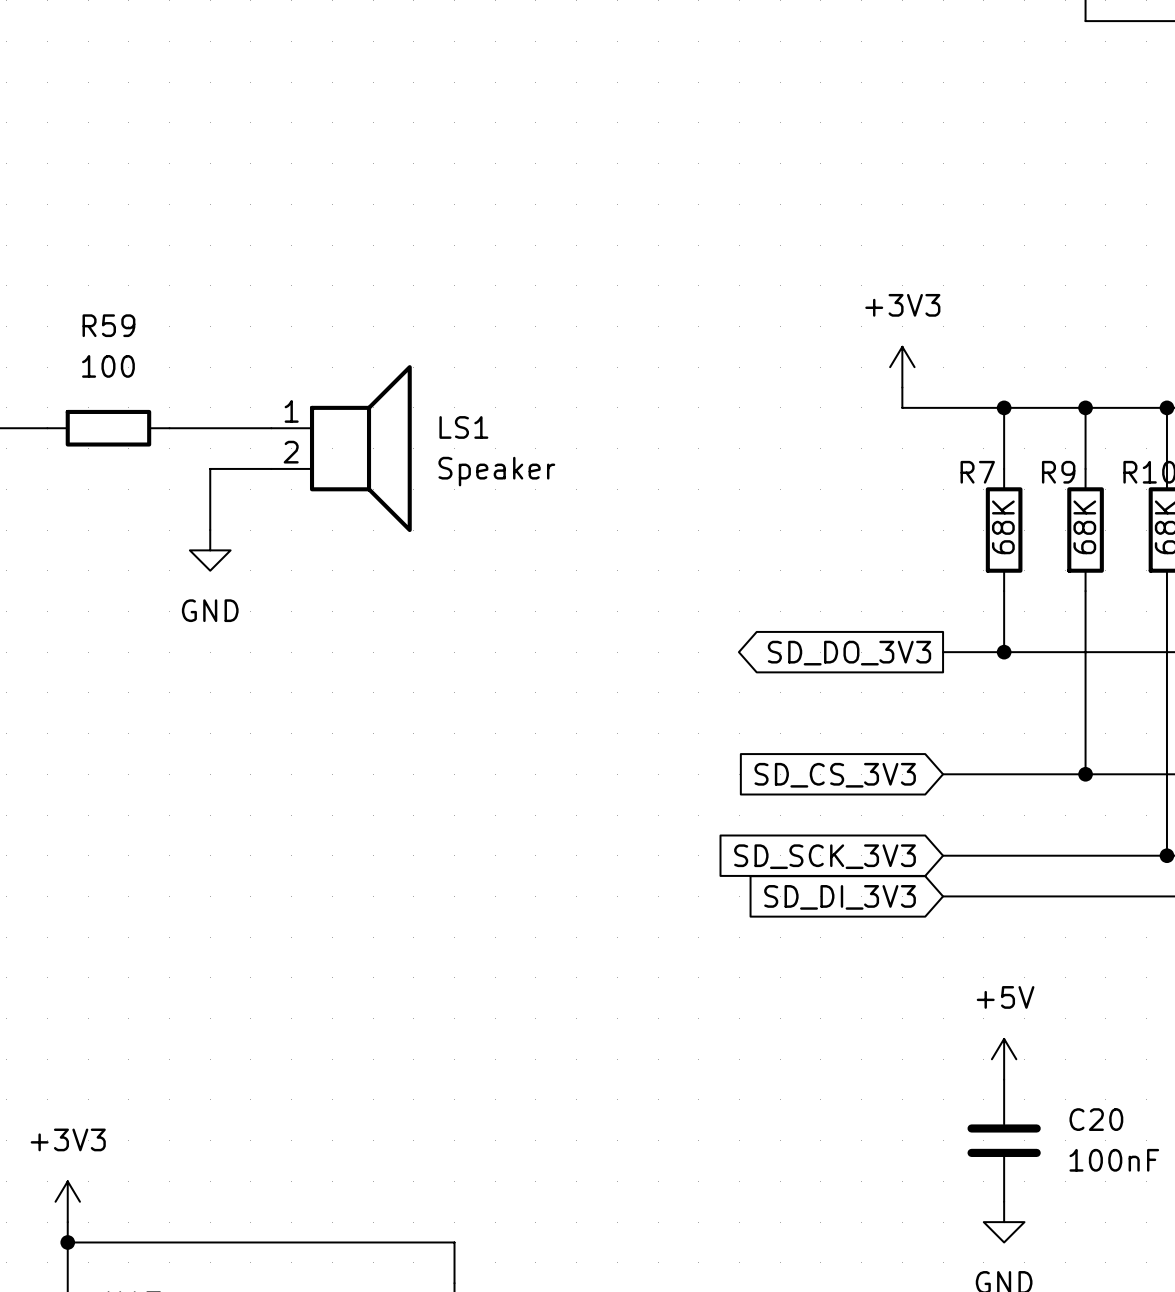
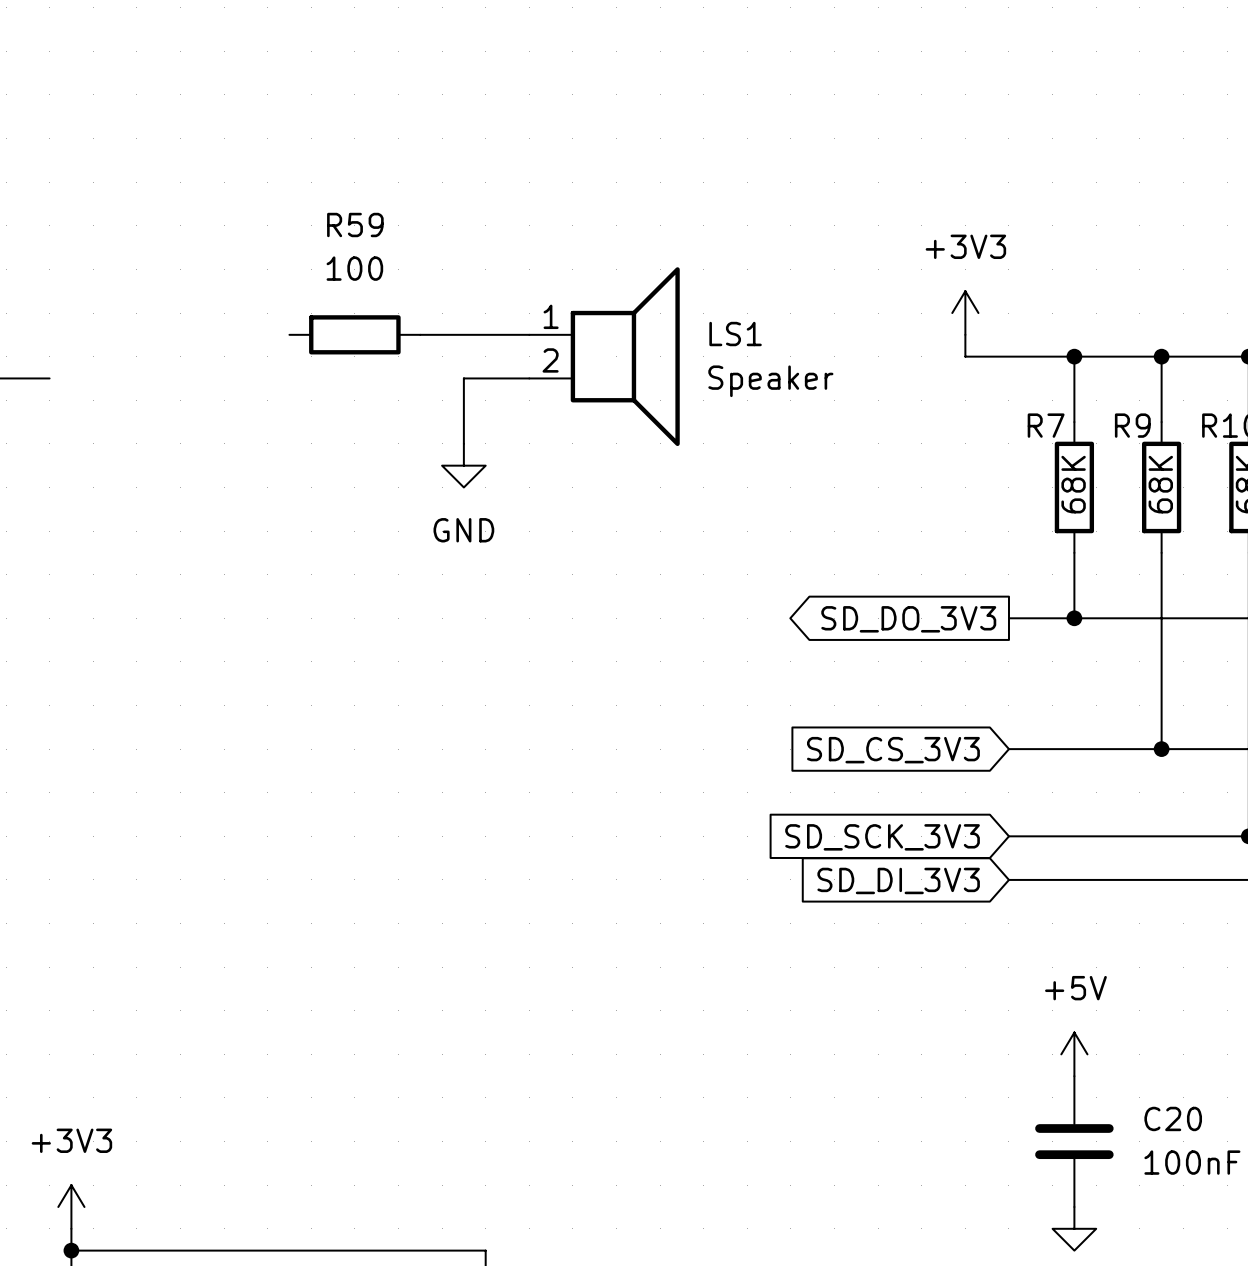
R59 position: (108, 428) -> (354, 334)
wire: (169, 428) (271, 428) -> (420, 334) (529, 334)
LS1 position: (341, 448) -> (604, 356)
wire: (271, 468) (210, 468) (210, 530) -> (529, 378) (463, 378) (463, 443)
power symbol position: GND (210, 550) -> GND (463, 465)

